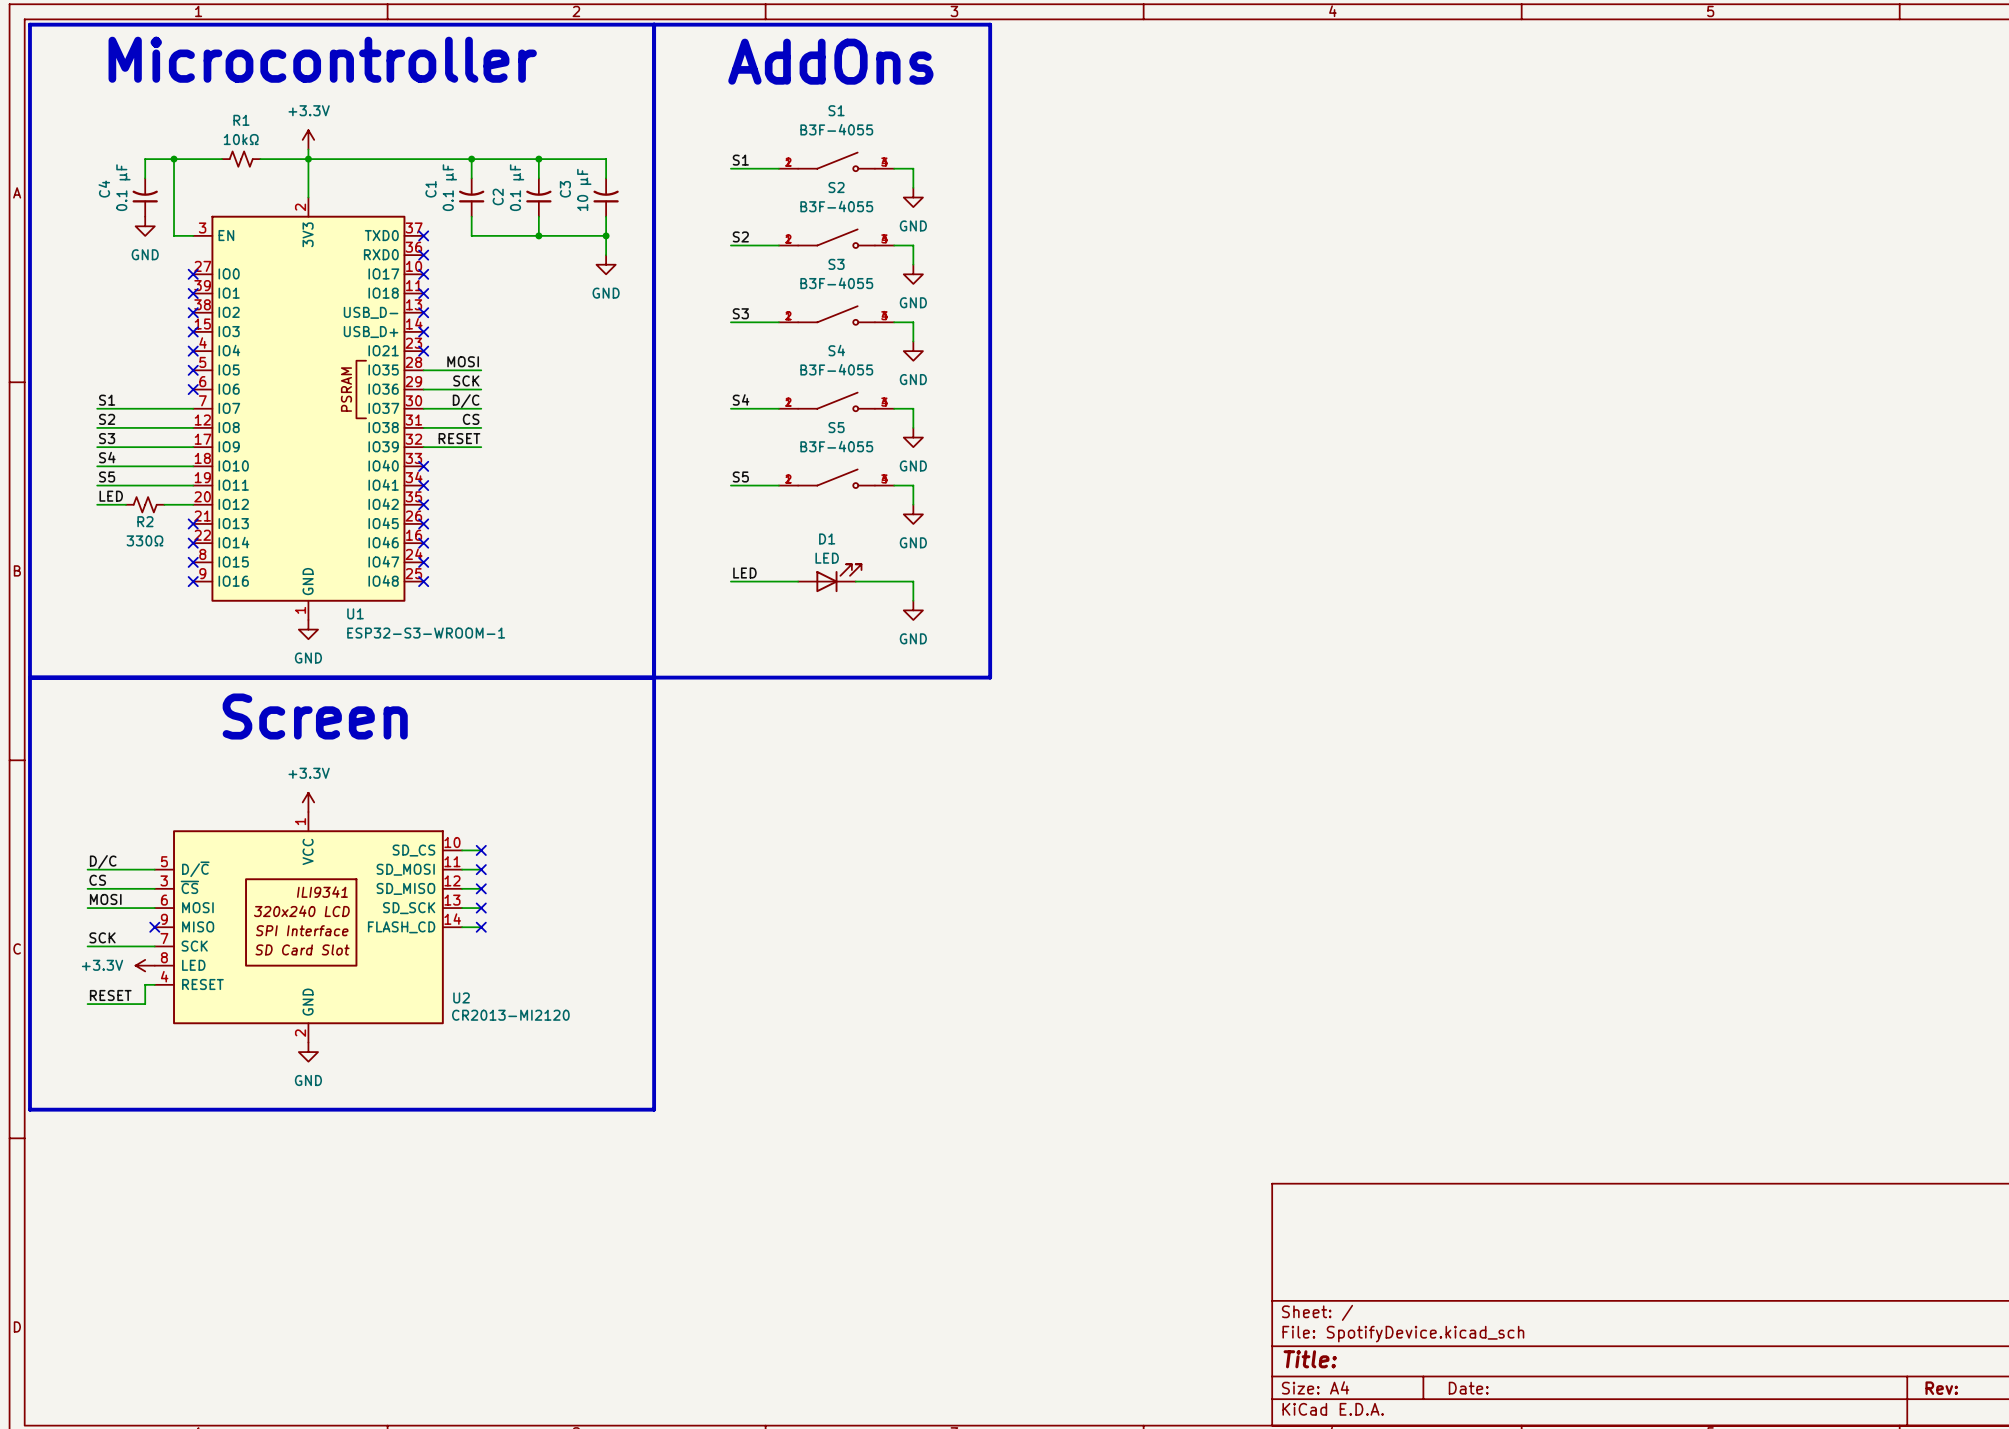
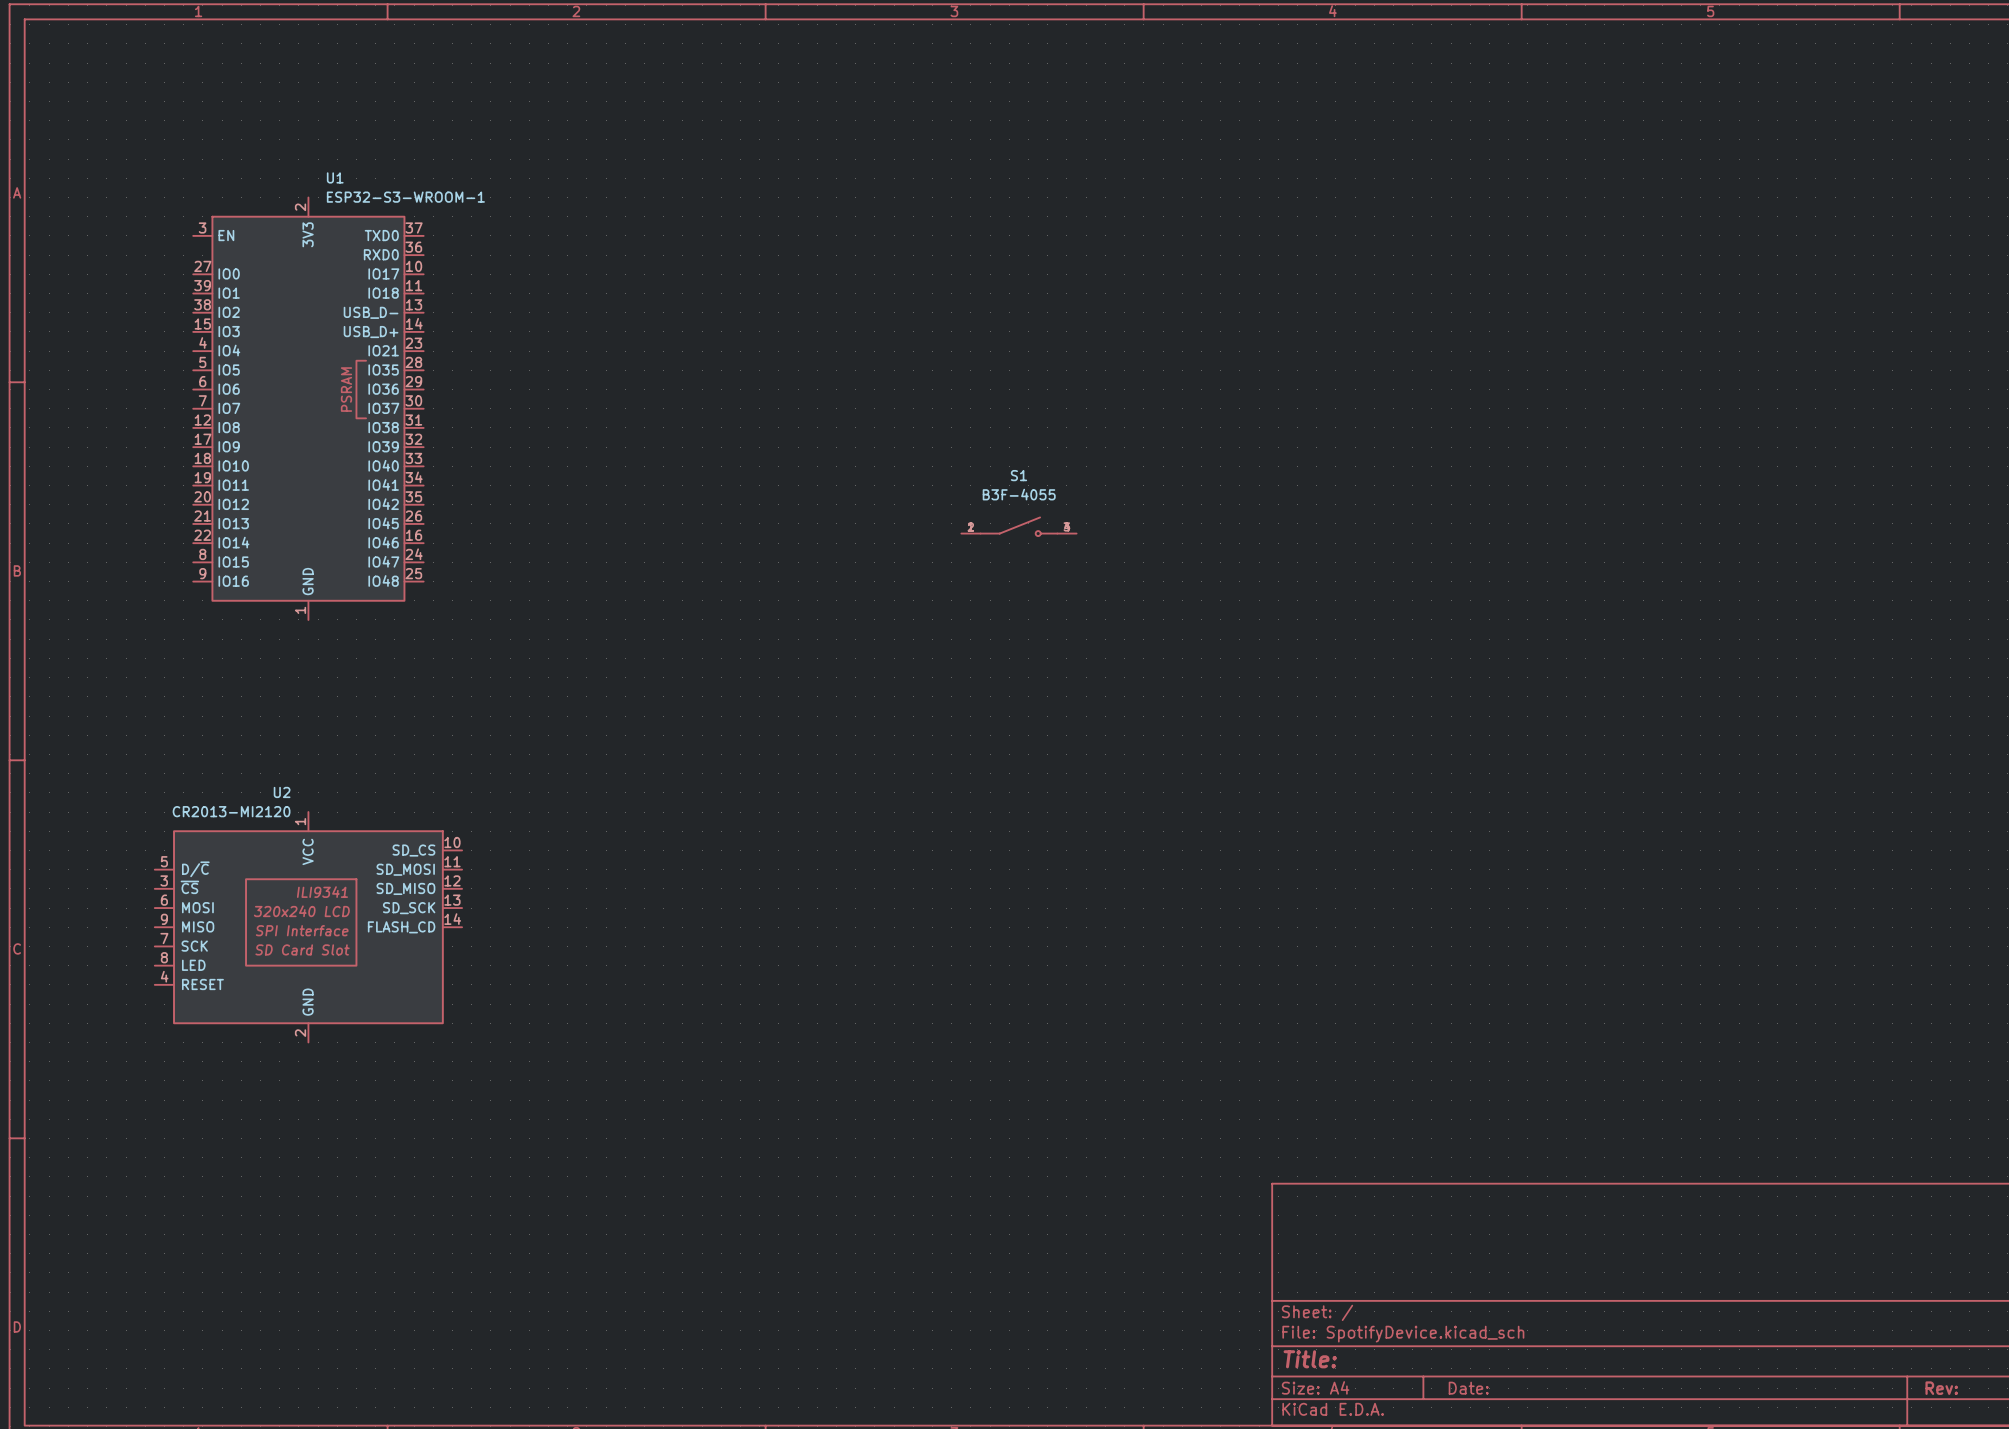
line: (654, 24) (654, 1109) (29, 1109) (29, 24) (990, 24) (990, 677) (29, 677) -> none
text: Microcontroller (322, 59) -> none
text: AddOns (830, 61) -> none
power symbol: +3.3V (308, 139) -> none
wire: (308, 149) (308, 197) -> none
wire: (174, 159) (174, 235) (193, 235) -> none
junction: (174, 159) -> none
wire: (222, 159) (145, 159) (145, 178) -> none
R1: 10kΩ (241, 159) -> none
wire: (260, 159) (606, 159) (606, 178) -> none
junction: (308, 159) -> none
wire: (471, 159) (471, 178) -> none
junction: (471, 159) -> none
wire: (538, 159) (538, 178) -> none
junction: (538, 159) -> none
label: S1 (740, 160) -> none
S1 position: (836, 161) -> (1018, 526)
wire: (730, 168) (778, 168) -> none
wire: (894, 168) (913, 168) (913, 187) -> none
C4: 0.1 μF (145, 197) -> none
C1: 0.1 μF (471, 197) -> none
C2: 0.1 μF (538, 197) -> none
C3: 10 μF (606, 197) -> none
power symbol: GND (913, 197) -> none
wire: (471, 216) (471, 235) (606, 235) -> none
wire: (538, 216) (538, 235) -> none
wire: (606, 216) (606, 255) -> none
power symbol: GND (145, 226) -> none
no-connect mark: (423, 235) -> none
junction: (538, 235) -> none
junction: (606, 235) -> none
label: S2 (740, 236) -> none
S2: B3F-4055 (836, 238) -> none
wire: (730, 245) (778, 245) -> none
wire: (894, 245) (913, 245) (913, 264) -> none
no-connect mark: (423, 255) -> none
power symbol: GND (606, 264) -> none
no-connect mark: (193, 274) -> none
no-connect mark: (423, 274) -> none
power symbol: GND (913, 274) -> none
no-connect mark: (193, 293) -> none
no-connect mark: (423, 293) -> none
no-connect mark: (193, 312) -> none
no-connect mark: (423, 312) -> none
label: S3 (740, 313) -> none
S3: B3F-4055 (836, 315) -> none
wire: (730, 322) (778, 322) -> none
wire: (894, 322) (913, 322) (913, 341) -> none
no-connect mark: (193, 331) -> none
no-connect mark: (423, 331) -> none
no-connect mark: (193, 351) -> none
no-connect mark: (423, 351) -> none
power symbol: GND (913, 351) -> none
label: MOSI (463, 361) -> none
no-connect mark: (193, 370) -> none
wire: (423, 370) (481, 370) -> none
label: SCK (466, 380) -> none
no-connect mark: (193, 389) -> none
wire: (423, 389) (481, 389) -> none
label: S4 (741, 399) -> none
label: S1 (107, 400) -> none
label: D/C (466, 401) -> none
S4: B3F-4055 (836, 401) -> none
wire: (97, 408) (193, 408) -> none
wire: (423, 408) (481, 408) -> none
wire: (730, 408) (778, 408) -> none
wire: (894, 408) (913, 408) (913, 427) -> none
label: S2 (107, 419) -> none
label: CS (471, 419) -> none
wire: (97, 427) (193, 427) -> none
wire: (423, 427) (481, 427) -> none
power symbol: GND (913, 437) -> none
label: S3 (107, 438) -> none
label: RESET (459, 438) -> none
wire: (97, 447) (193, 447) -> none
wire: (423, 447) (481, 447) -> none
label: S4 (107, 457) -> none
wire: (97, 466) (193, 466) -> none
no-connect mark: (423, 466) -> none
label: S5 (107, 476) -> none
label: S5 (740, 476) -> none
S5: B3F-4055 (836, 478) -> none
wire: (97, 485) (193, 485) -> none
no-connect mark: (423, 485) -> none
wire: (730, 485) (778, 485) -> none
wire: (894, 485) (913, 485) (913, 504) -> none
label: LED (111, 496) -> none
wire: (97, 504) (126, 504) -> none
R2: 330Ω (145, 504) -> none
wire: (164, 504) (193, 504) -> none
no-connect mark: (423, 504) -> none
power symbol: GND (913, 514) -> none
no-connect mark: (193, 523) -> none
no-connect mark: (423, 523) -> none
no-connect mark: (193, 543) -> none
no-connect mark: (423, 543) -> none
no-connect mark: (193, 562) -> none
no-connect mark: (423, 562) -> none
label: LED (744, 573) -> none
D1: LED (829, 578) -> none
no-connect mark: (193, 581) -> none
no-connect mark: (423, 581) -> none
wire: (730, 581) (798, 581) -> none
wire: (855, 581) (913, 581) (913, 600) -> none
power symbol: GND (913, 610) -> none
U1 name position: U1 (355, 613) -> U1 (335, 177)
power symbol: GND (308, 629) -> none
U1 value position: ESP32-S3-WROOM-1 (426, 633) -> ESP32-S3-WROOM-1 (405, 197)
text: Screen (315, 716) -> none
power symbol: +3.3V (308, 802) -> none
wire: (462, 850) (481, 850) -> none
no-connect mark: (481, 850) -> none
label: D/C (103, 861) -> none
wire: (87, 869) (154, 869) -> none
wire: (462, 869) (481, 869) -> none
no-connect mark: (481, 869) -> none
label: CS (97, 880) -> none
wire: (87, 888) (154, 888) -> none
wire: (462, 888) (481, 888) -> none
no-connect mark: (481, 888) -> none
label: MOSI (105, 899) -> none
wire: (87, 908) (154, 908) -> none
wire: (462, 908) (481, 908) -> none
no-connect mark: (481, 908) -> none
no-connect mark: (154, 927) -> none
wire: (462, 927) (481, 927) -> none
no-connect mark: (481, 927) -> none
label: SCK (102, 937) -> none
wire: (87, 946) (154, 946) -> none
power symbol: +3.3V (145, 965) -> none
wire: (154, 984) (145, 984) (145, 1004) (87, 1004) -> none
label: RESET (110, 995) -> none
U2 name position: U2 (461, 997) -> U2 (282, 792)
U2 value position: CR2013-MI2120 (510, 1015) -> CR2013-MI2120 (231, 811)
power symbol: GND (308, 1052) -> none

